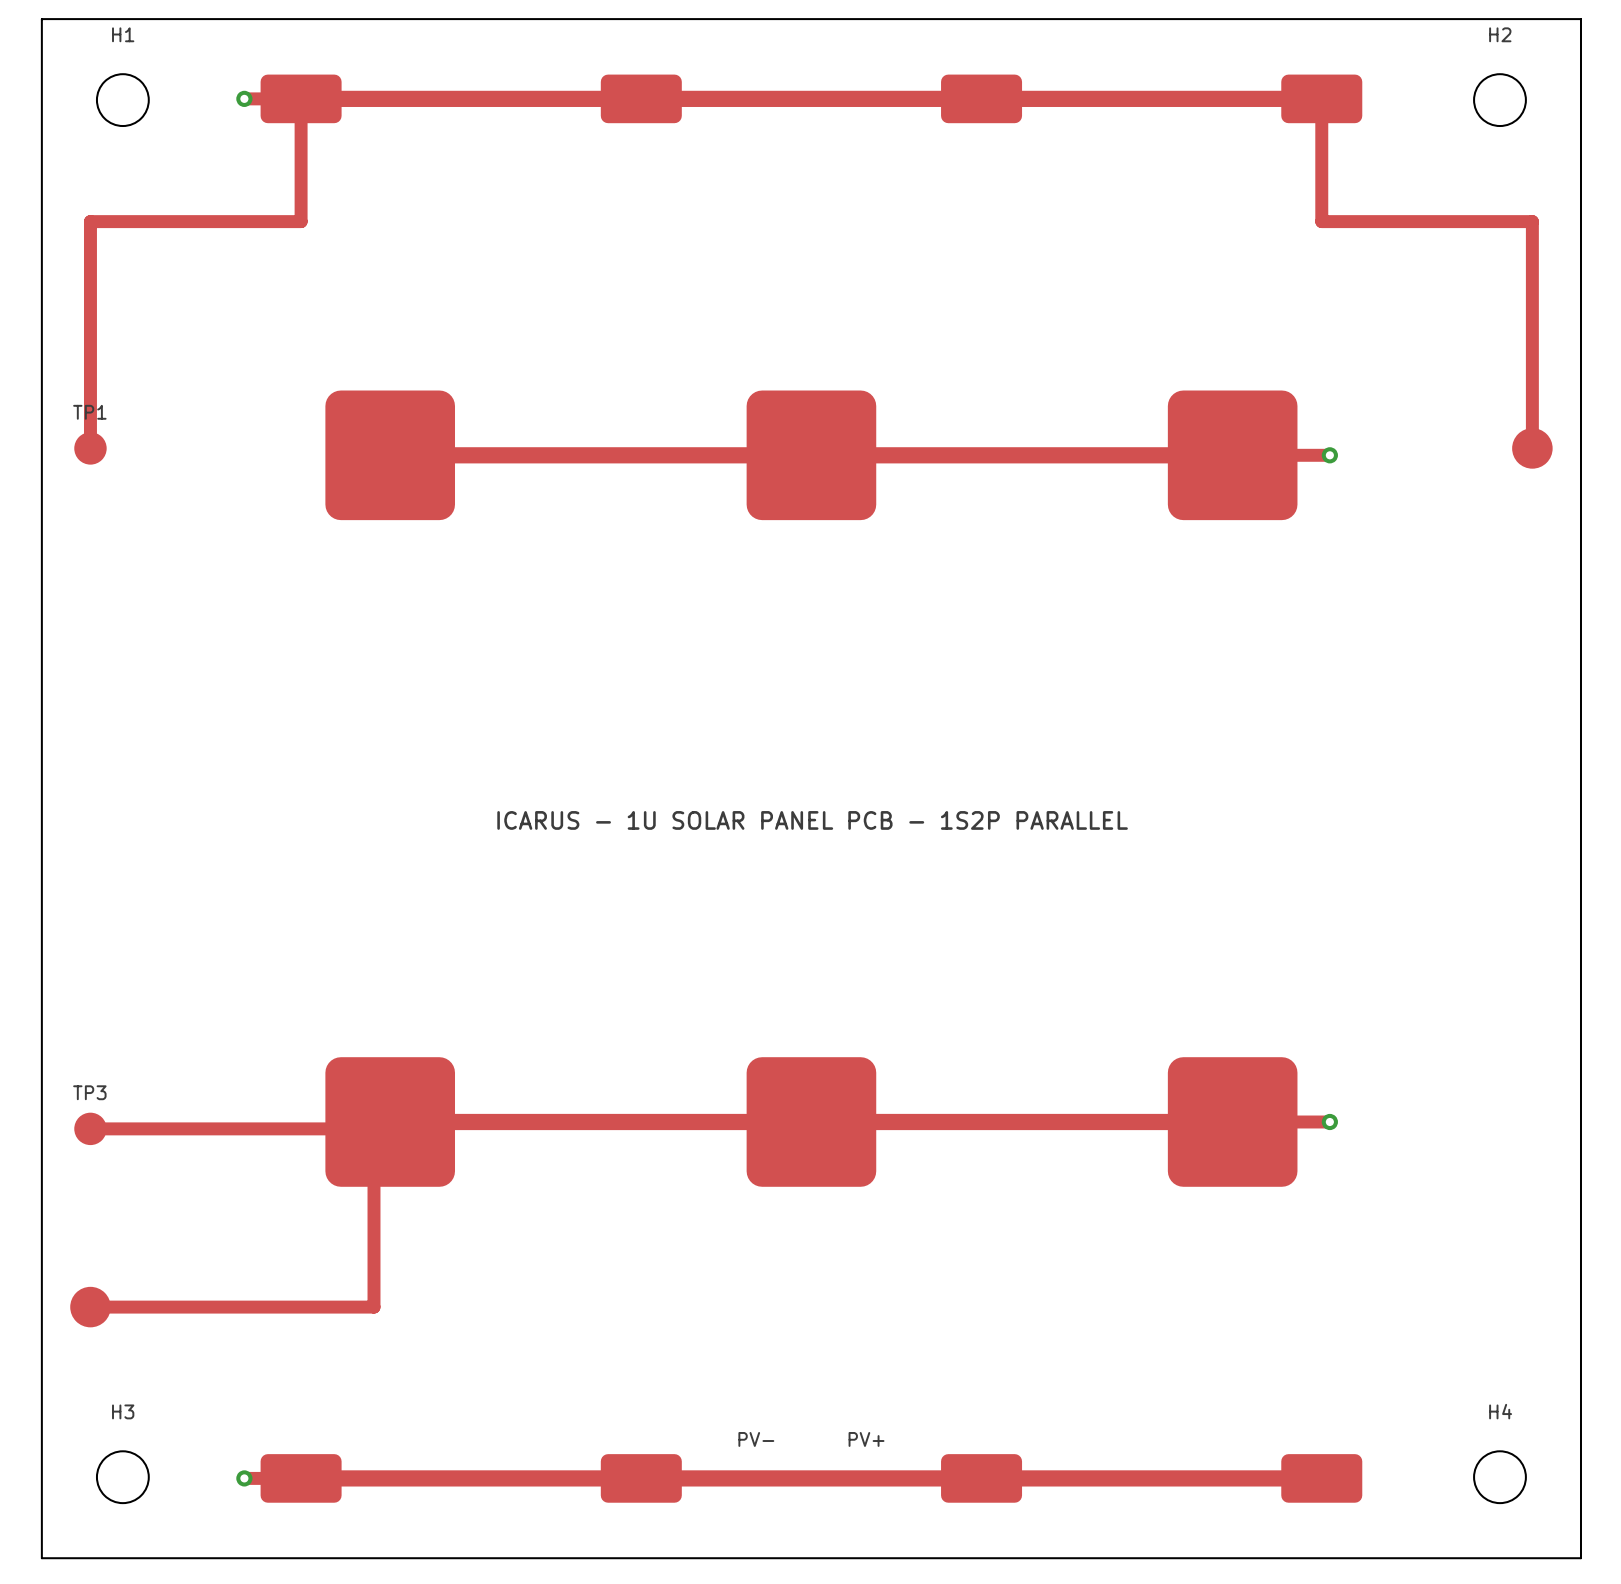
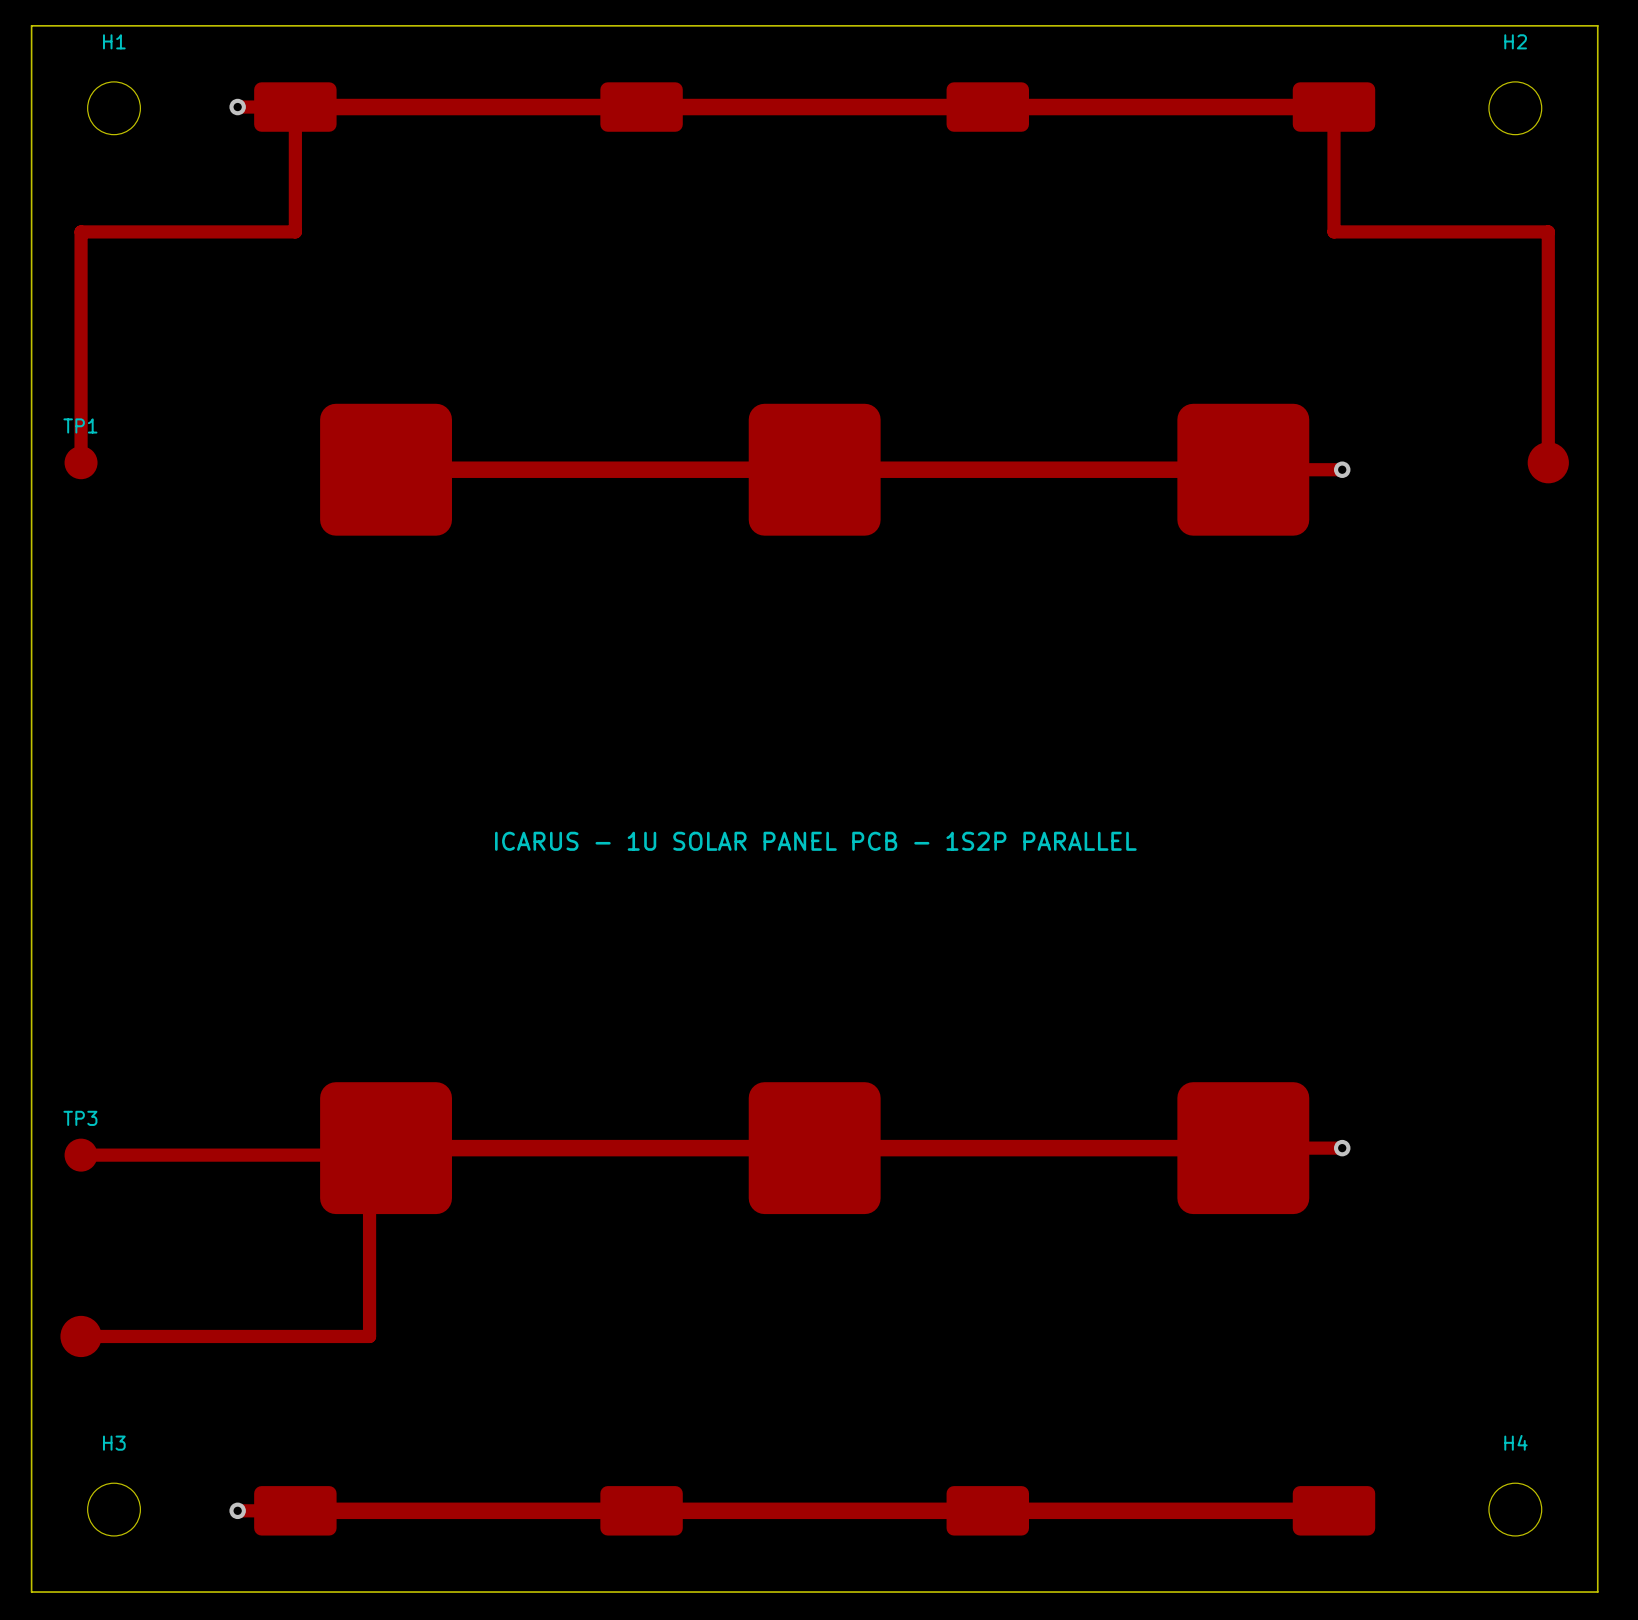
text: PV- (756, 1439) -> none
text: PV+ (866, 1439) -> none

